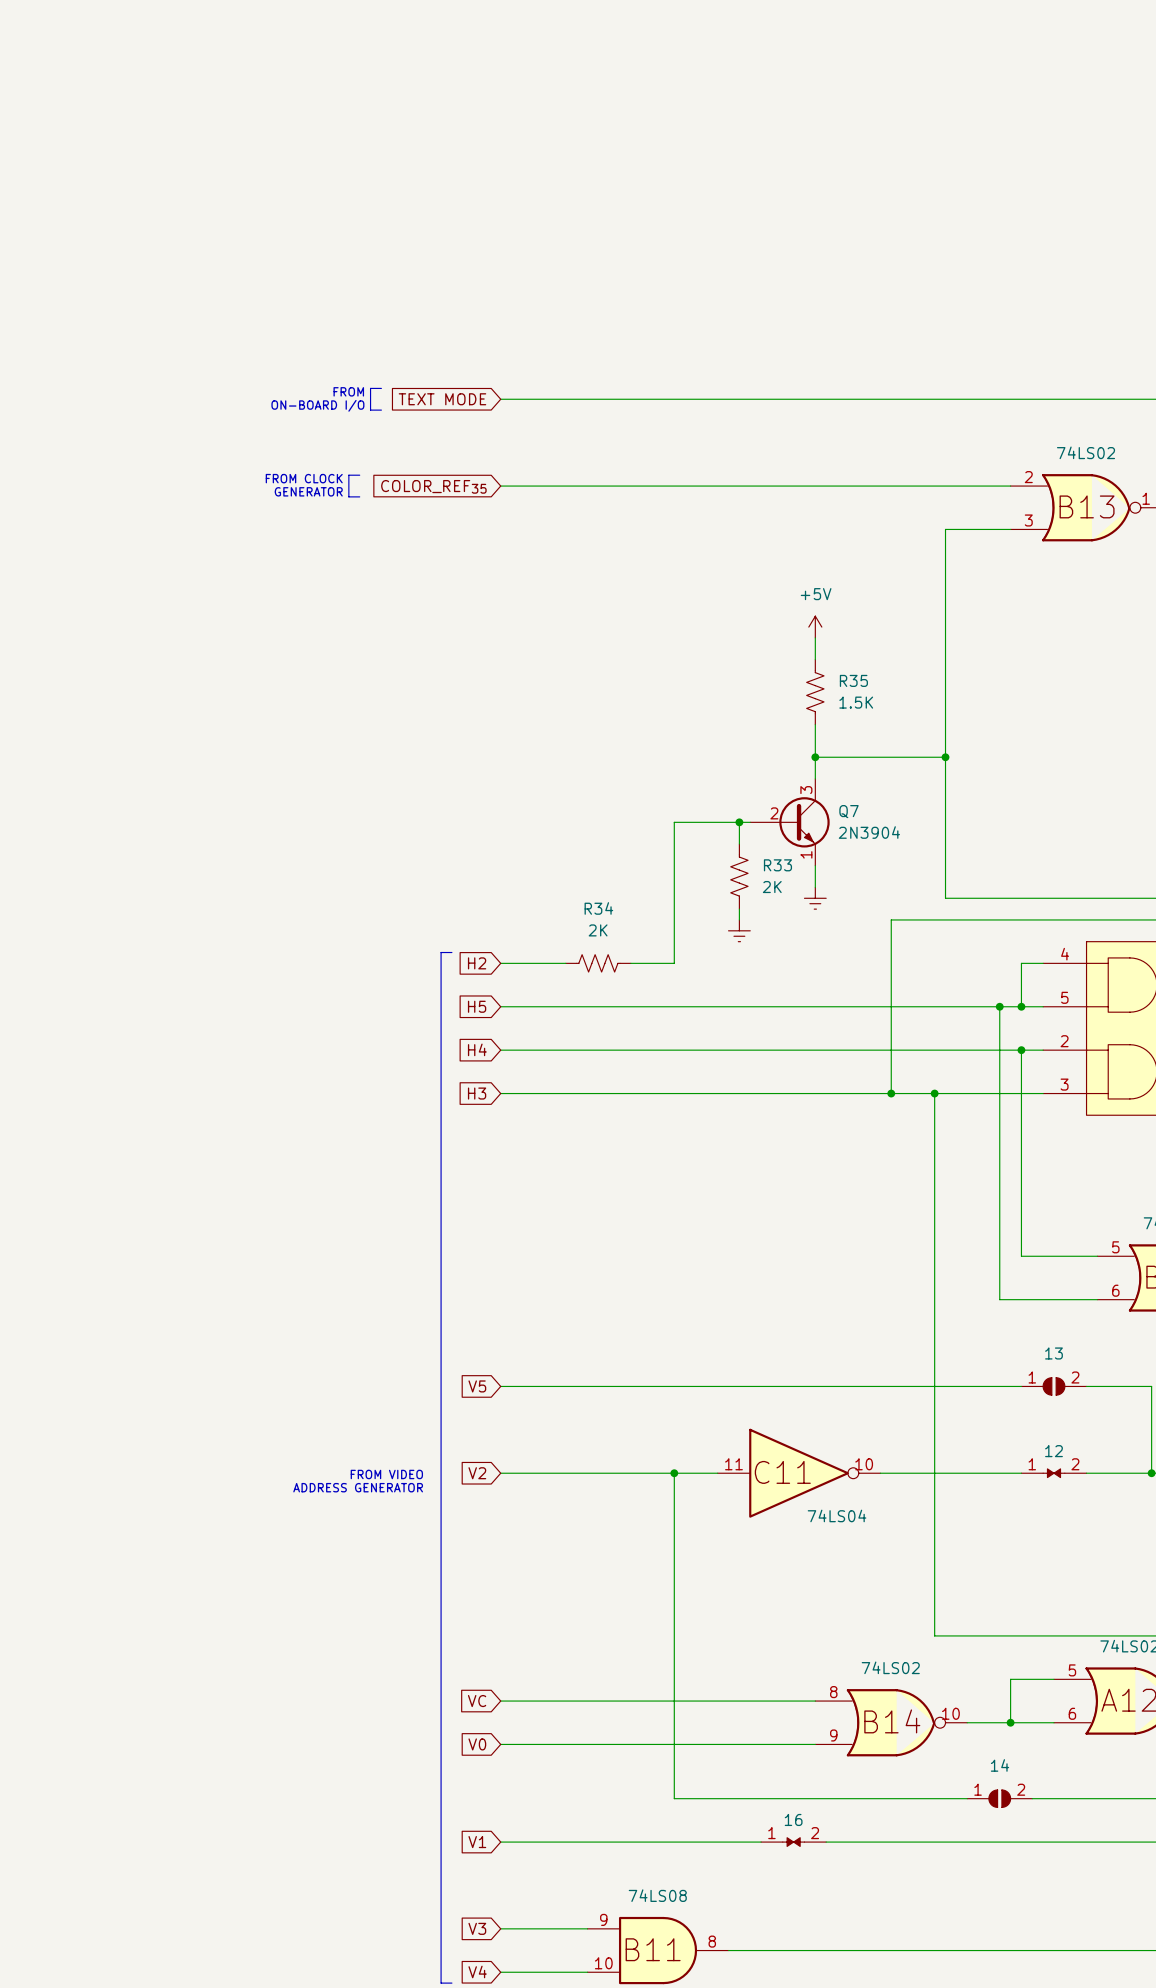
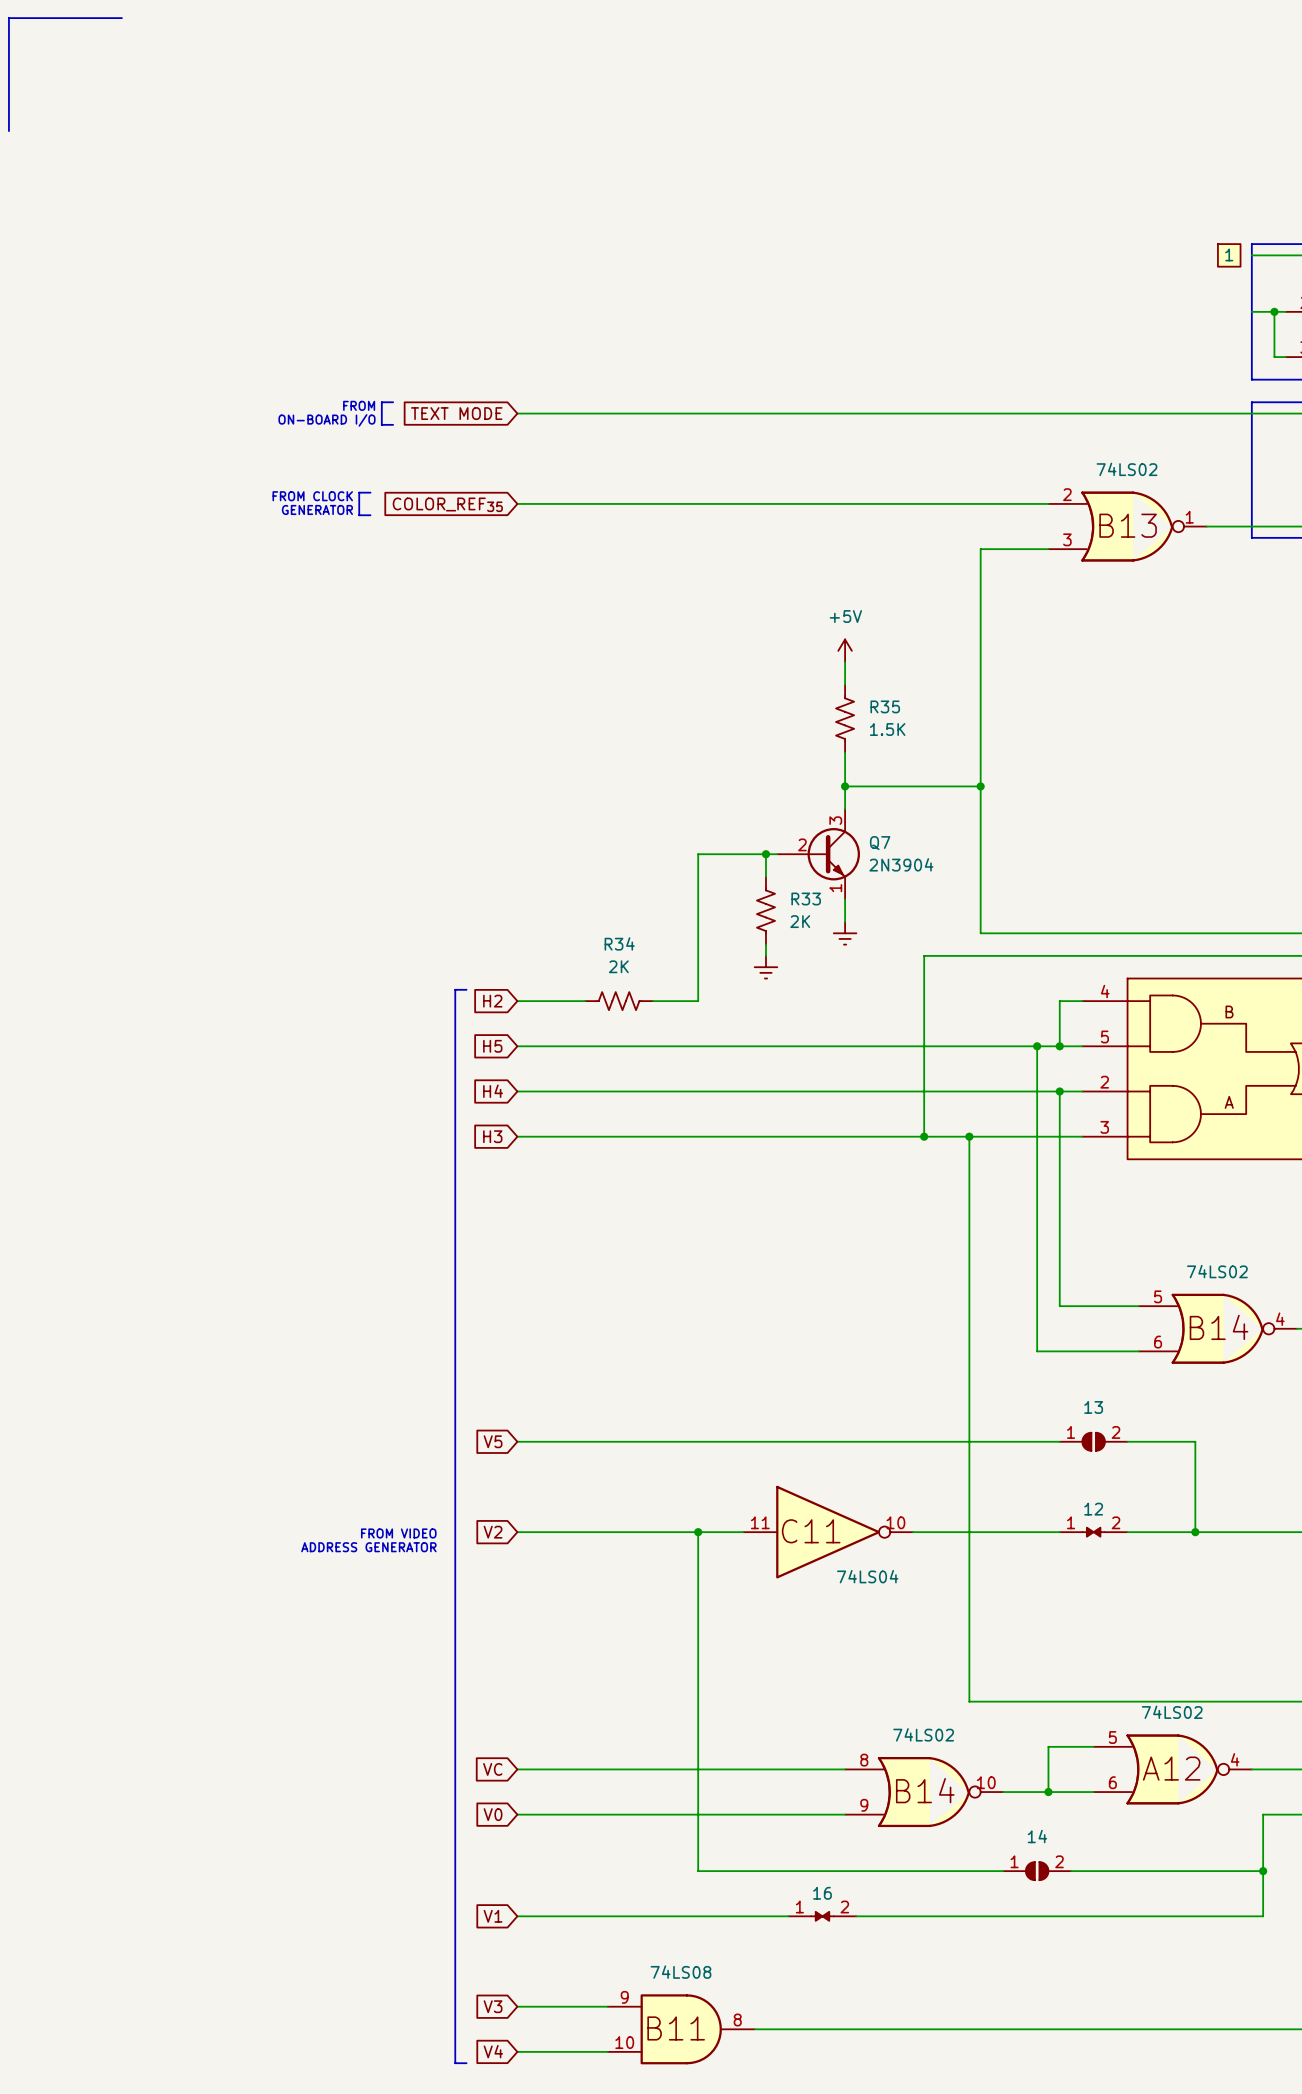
line: none -> (121, 18) (8, 18) (8, 131)

